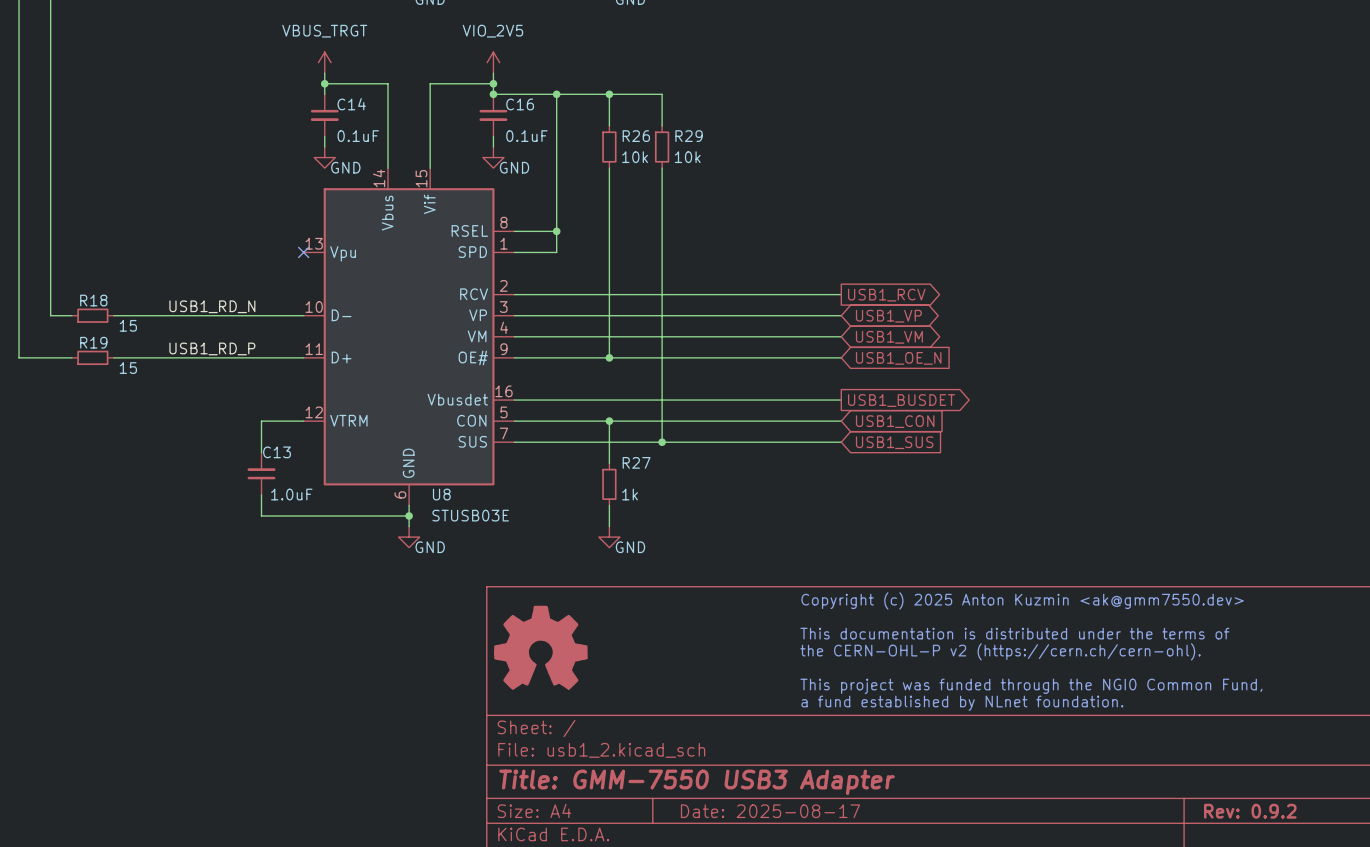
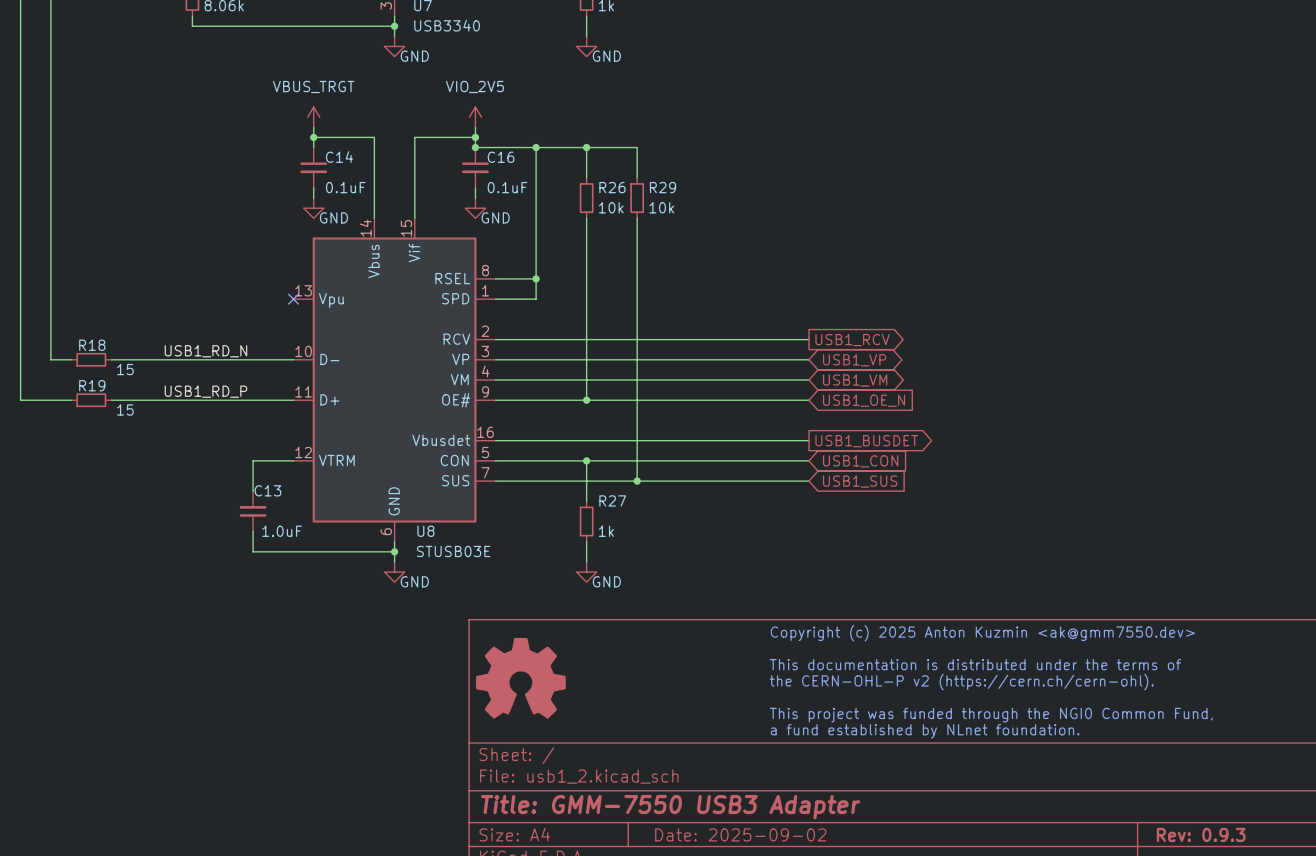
title block: Date: 2025-08-17 (770, 811) -> Date: 2025-09-02 (740, 834)
title block: Rev: 0.9.2 (1250, 811) -> Rev: 0.9.3 (1201, 834)

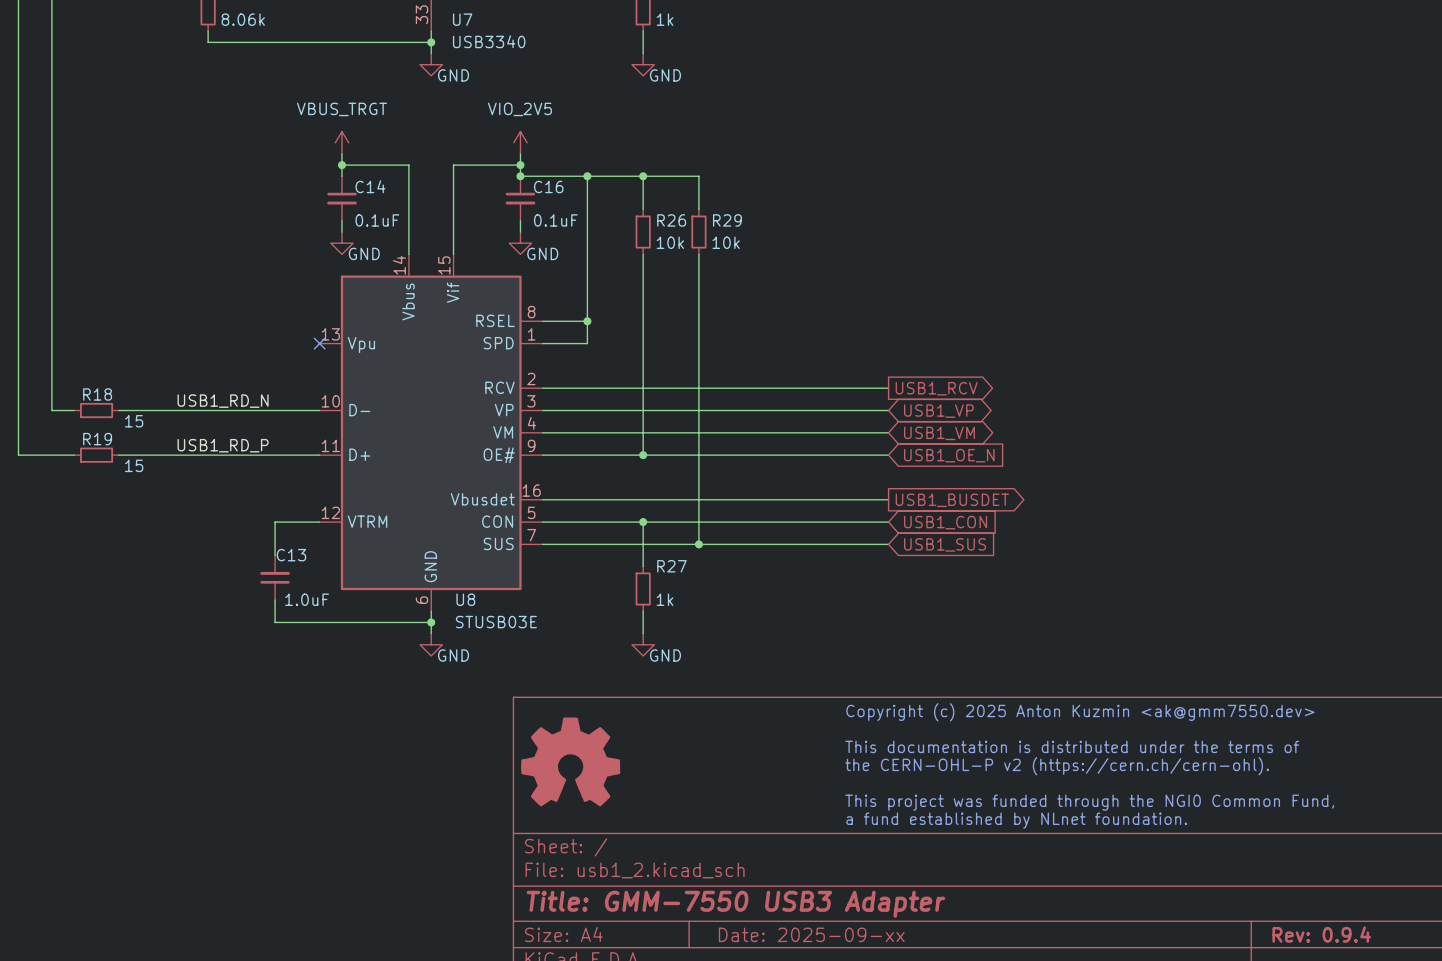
title block: Date: 2025-09-02 (740, 834) -> Date: 2025-09-xx (811, 934)
title block: Rev: 0.9.3 (1201, 834) -> Rev: 0.9.4 (1321, 934)

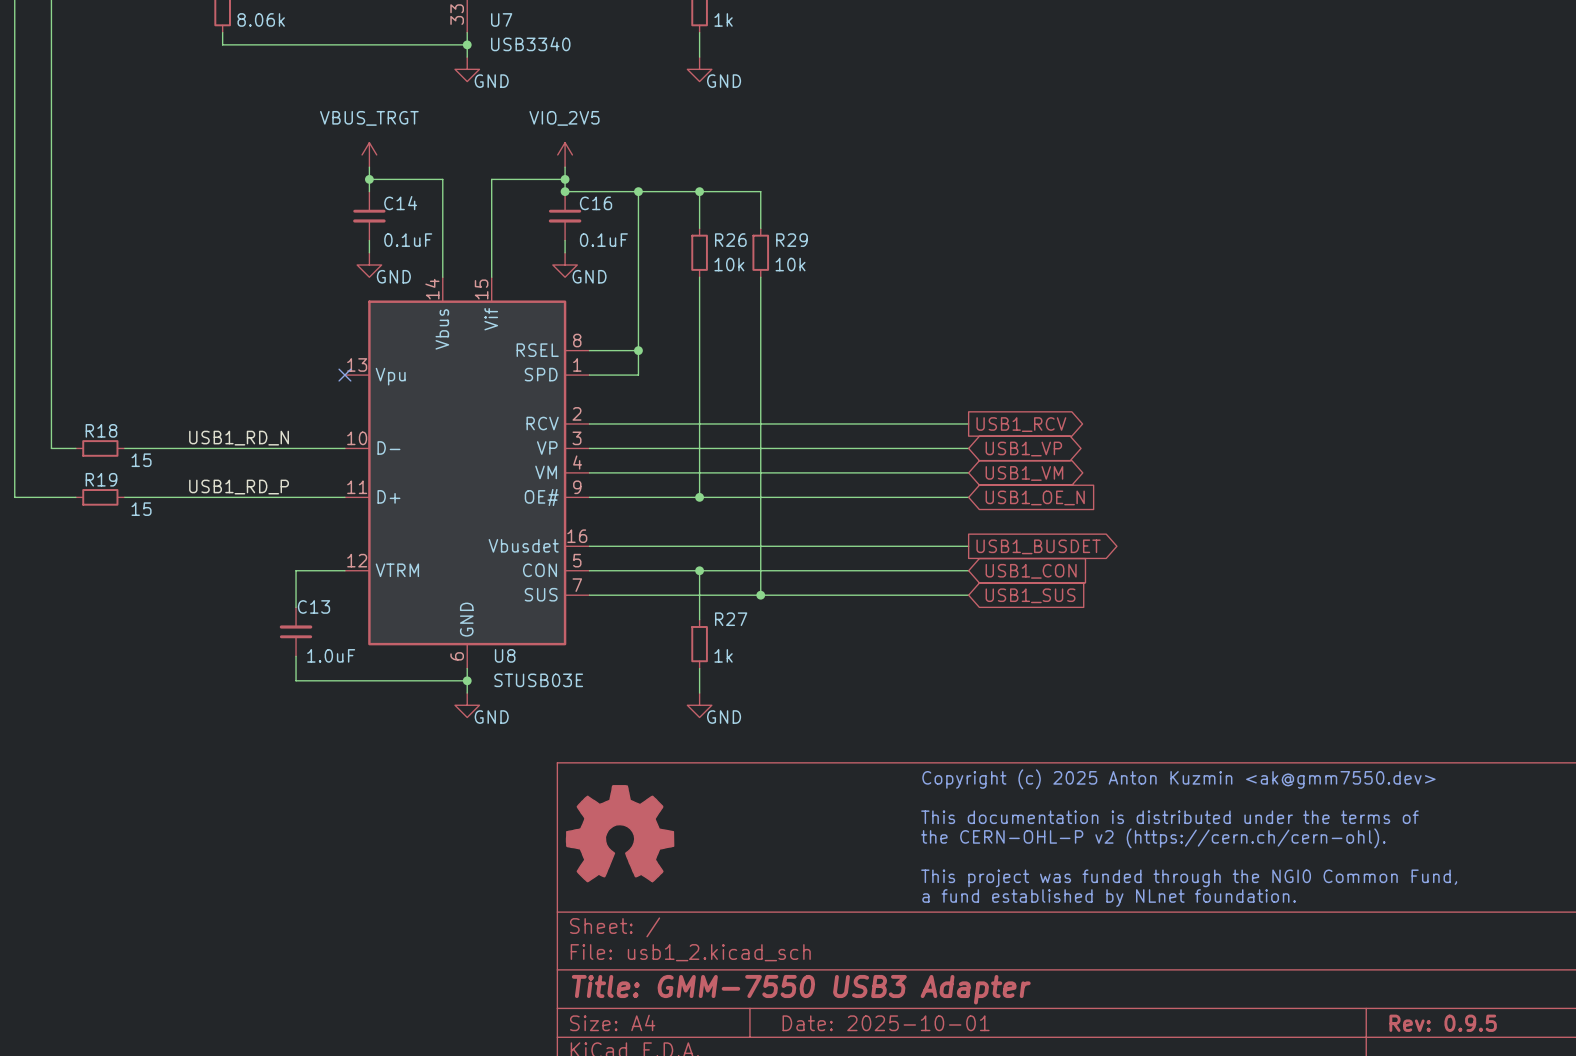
title block: Date: 2025-09-xx (811, 934) -> Date: 2025-10-01 (886, 1023)
title block: Rev: 0.9.4 (1321, 934) -> Rev: 0.9.5 (1443, 1023)

